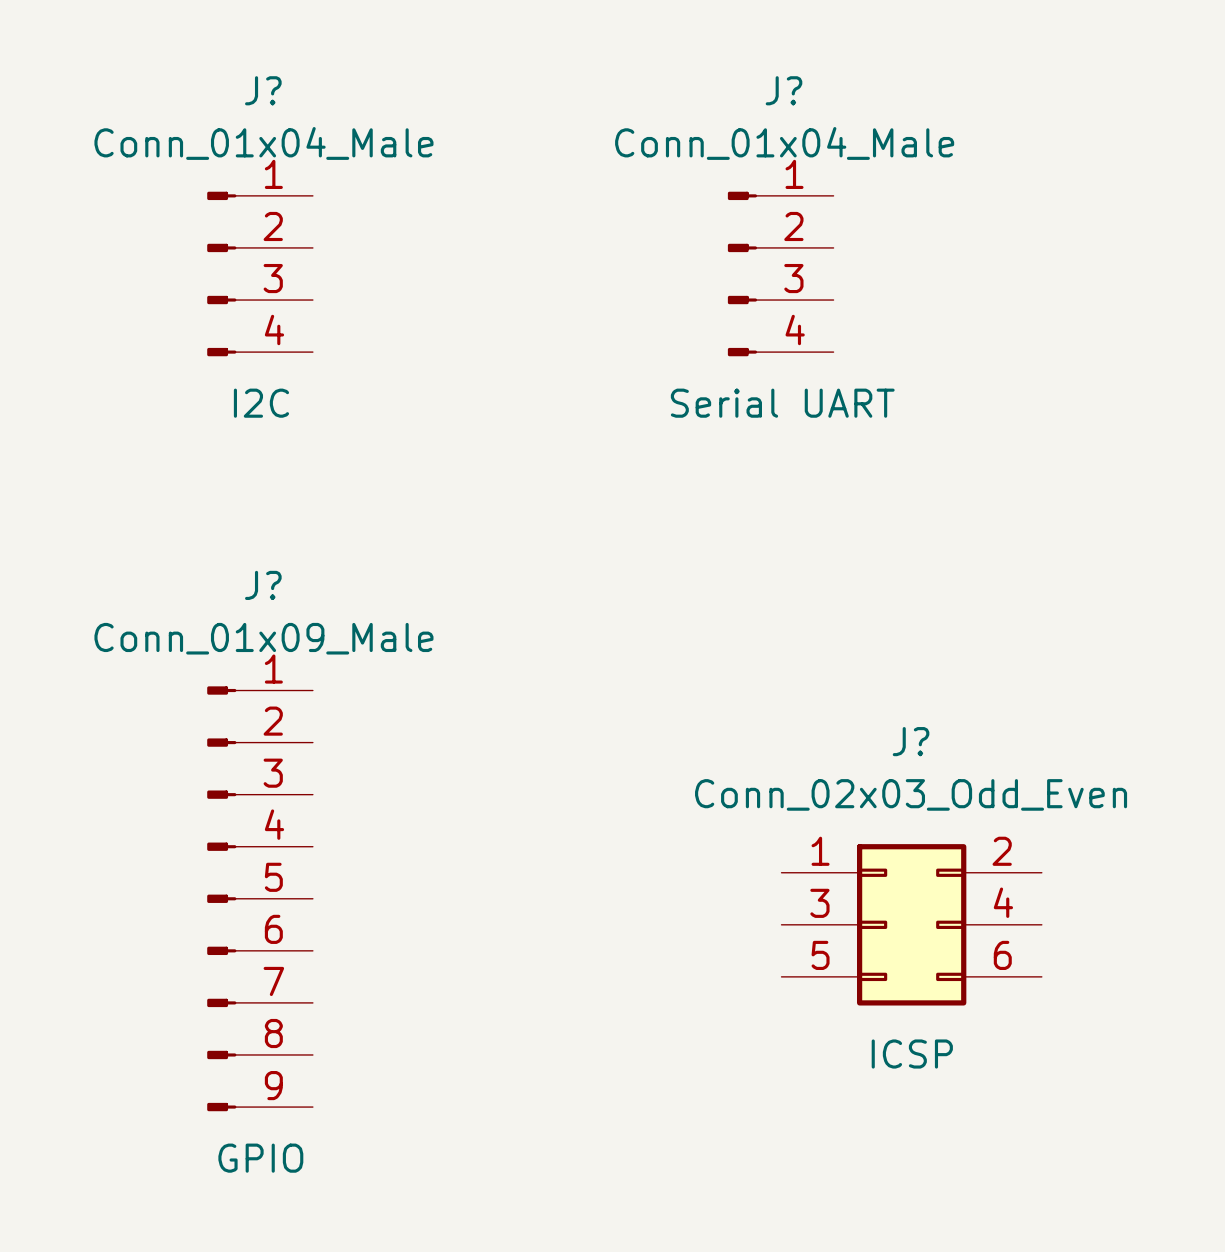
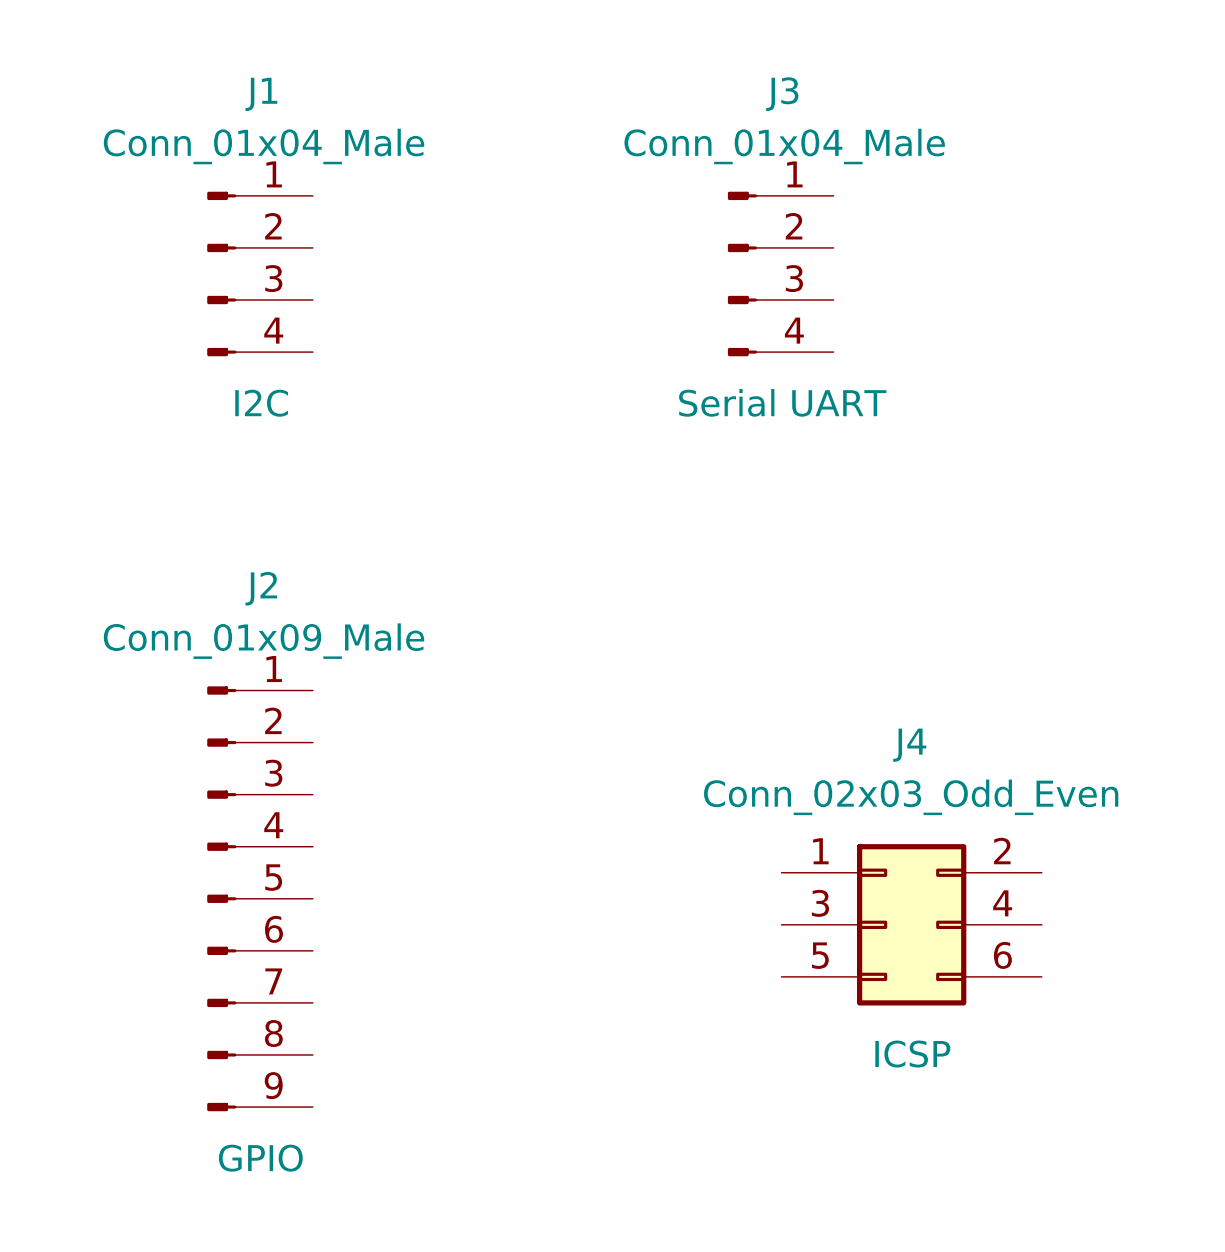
J? name: J? (263, 90) -> J1 (261, 94)
J? name: J? (784, 90) -> J3 (782, 94)
J? name: J? (263, 585) -> J2 (261, 588)
J? name: J? (911, 741) -> J4 (909, 745)

